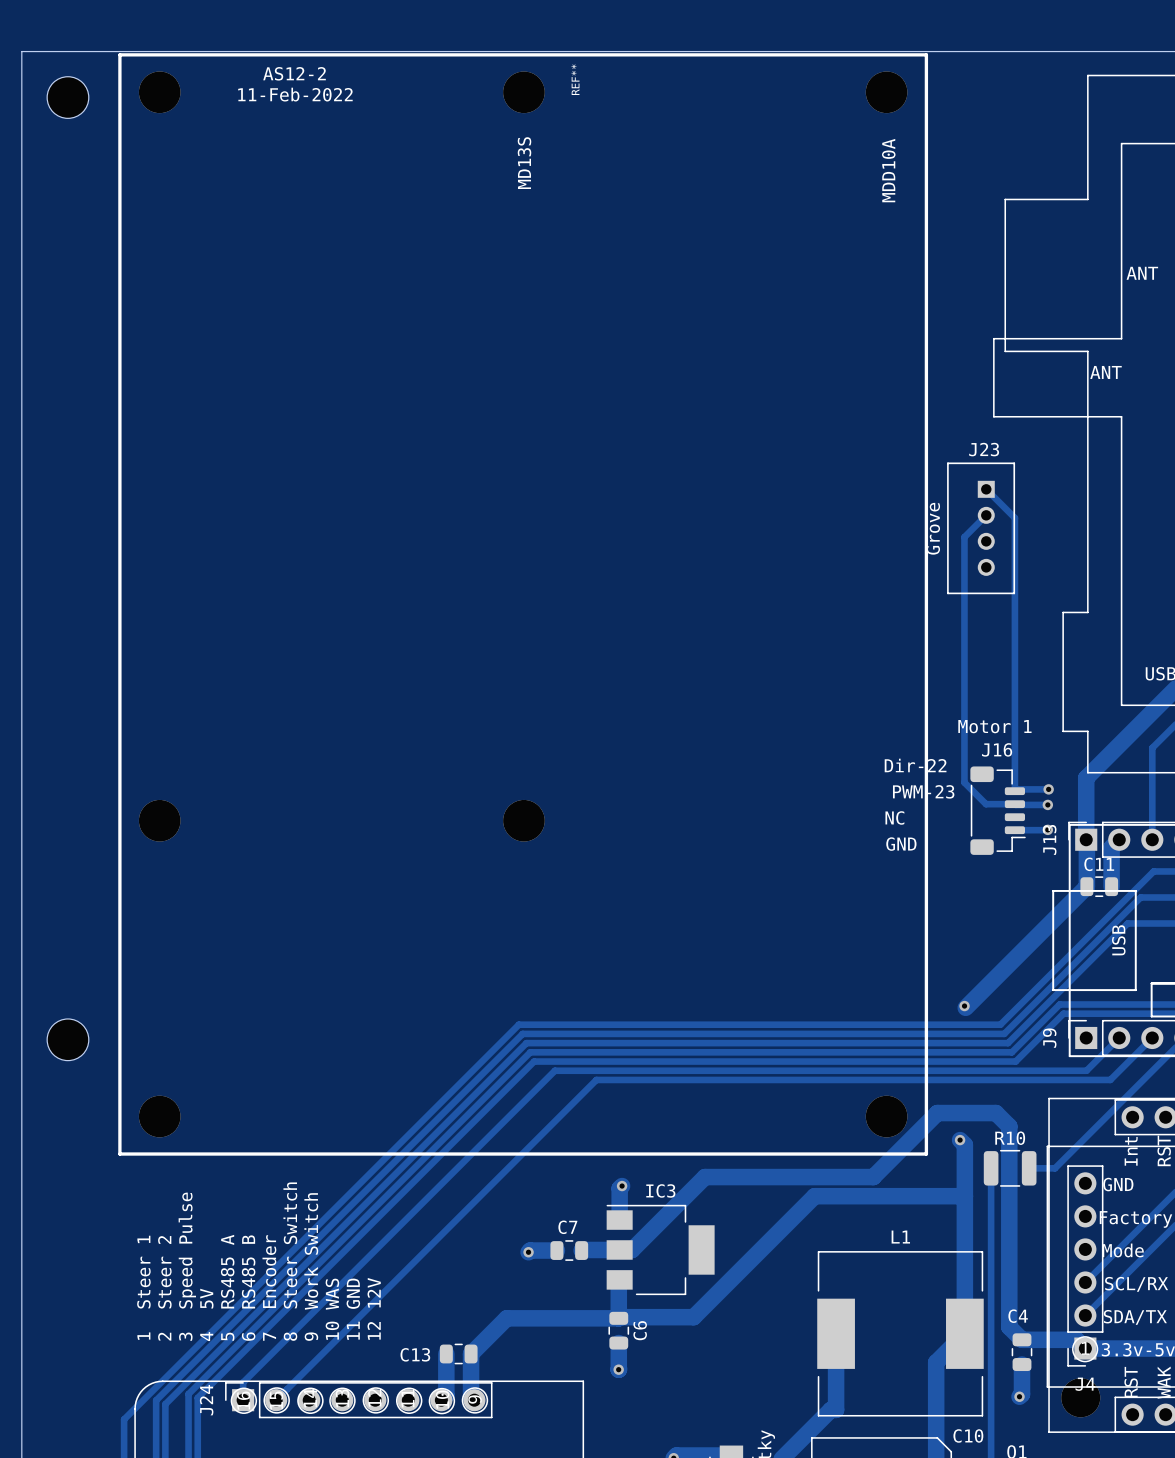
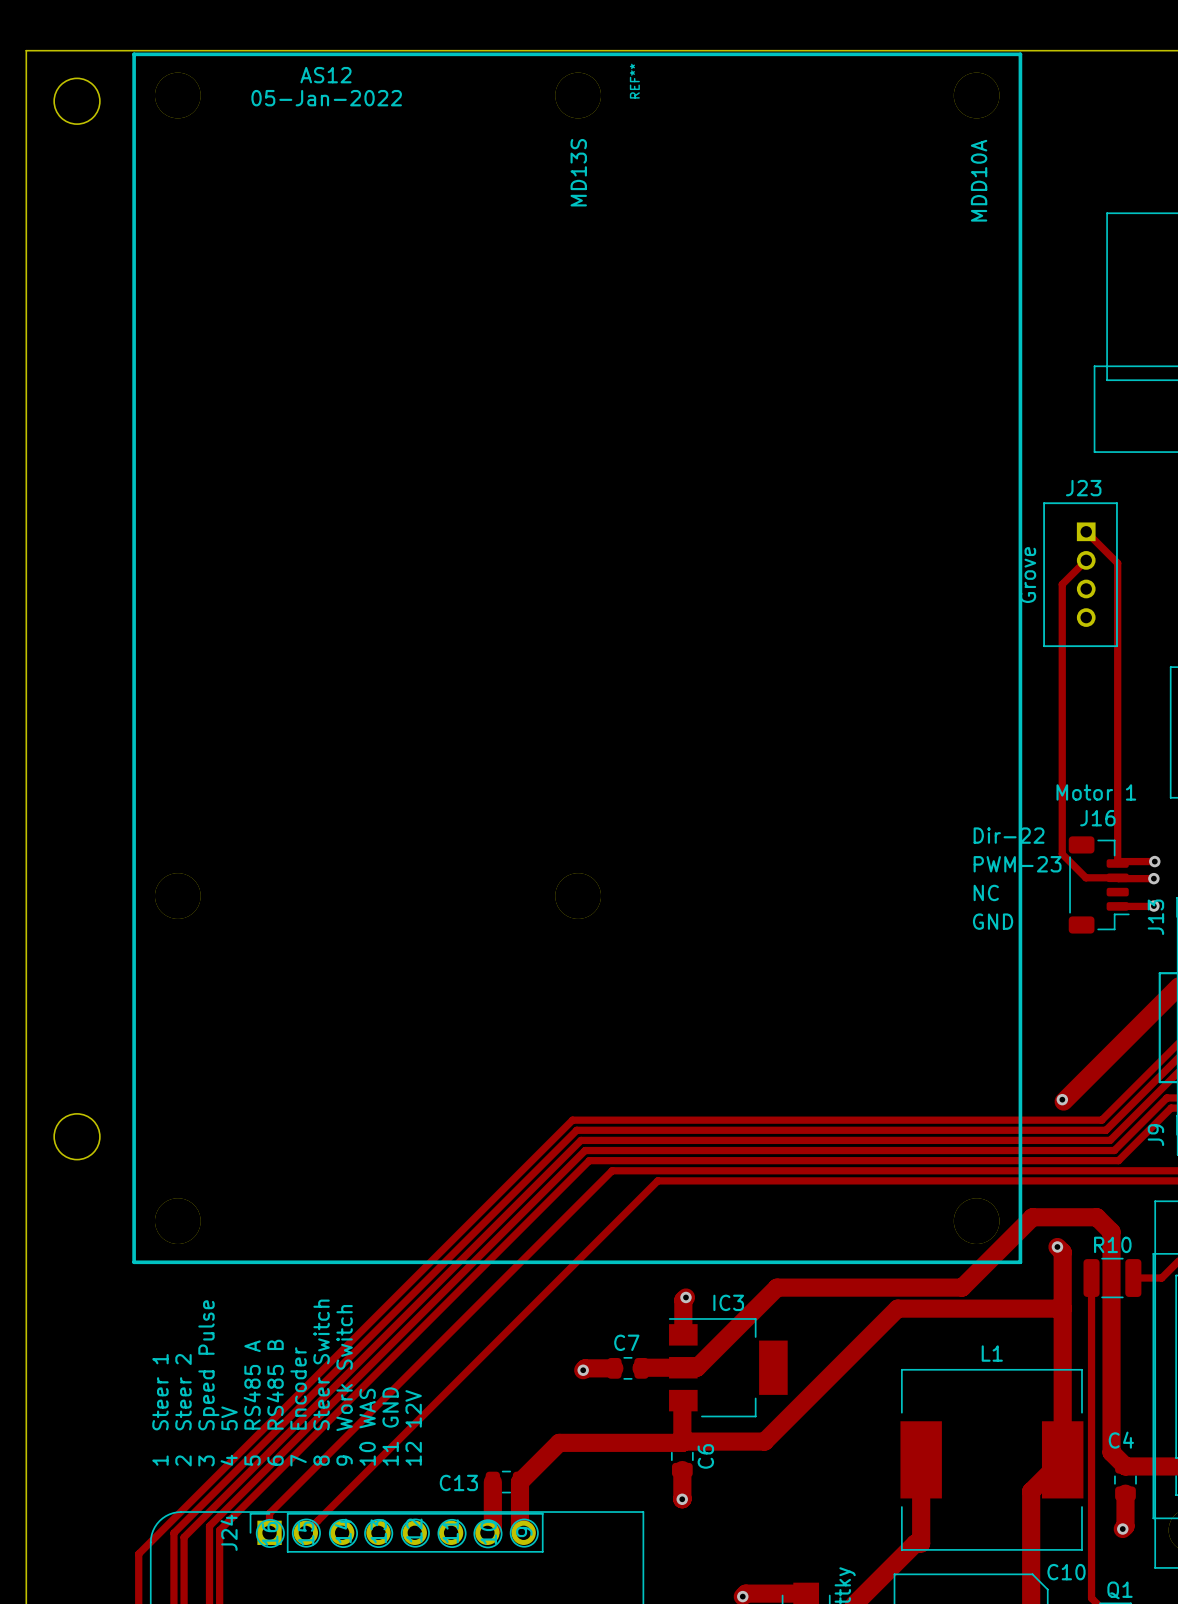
text: AS12-2 (294, 73) -> AS12 (325, 75)
text: 11-Feb-2022 (295, 94) -> 05-Jan-2022 (326, 98)

